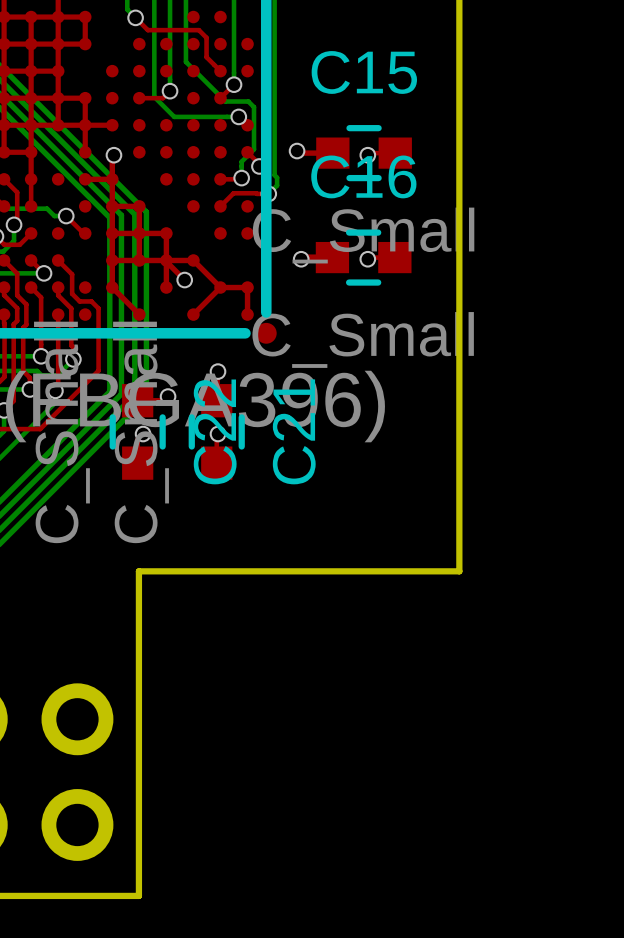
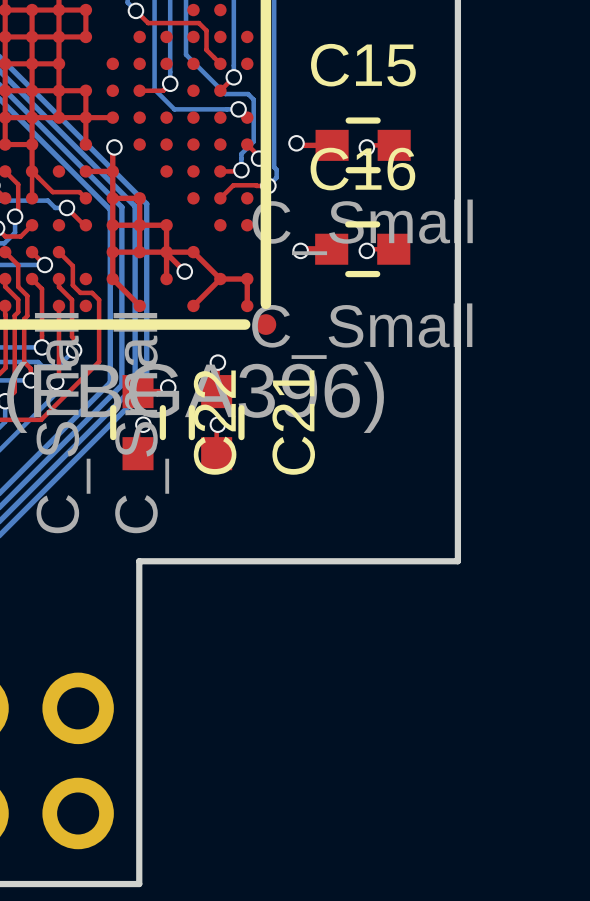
top track: none -> (32, 171) (52, 192) (79, 192) (85, 198)

